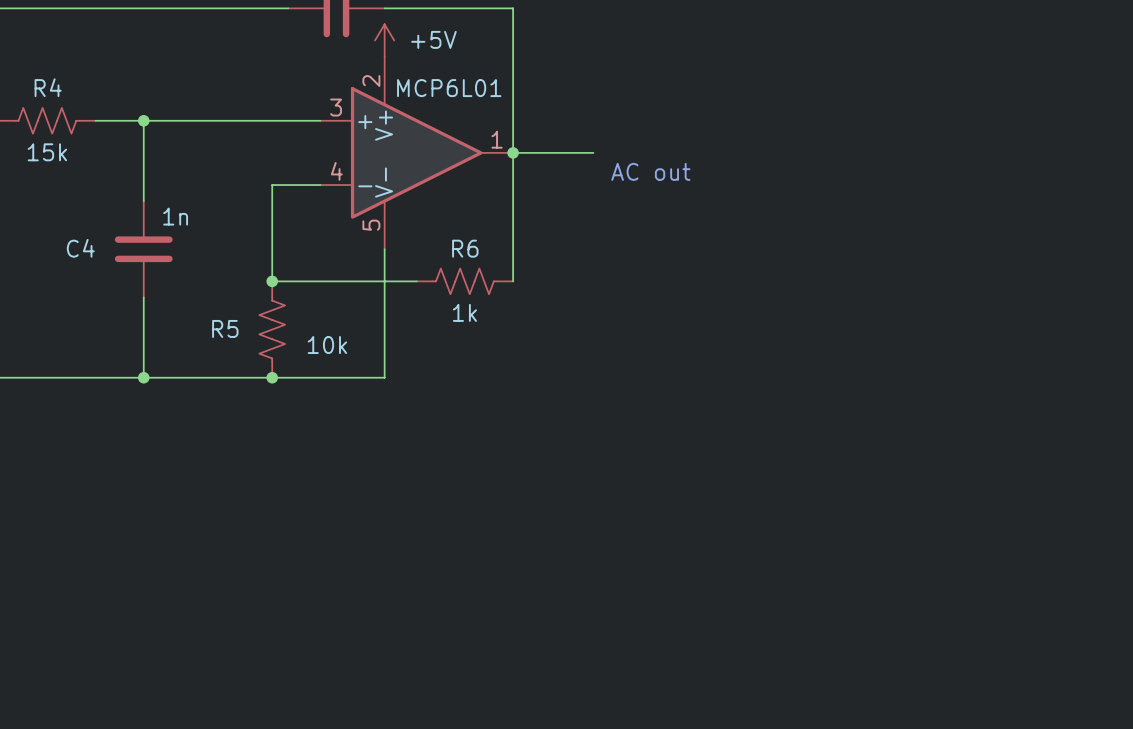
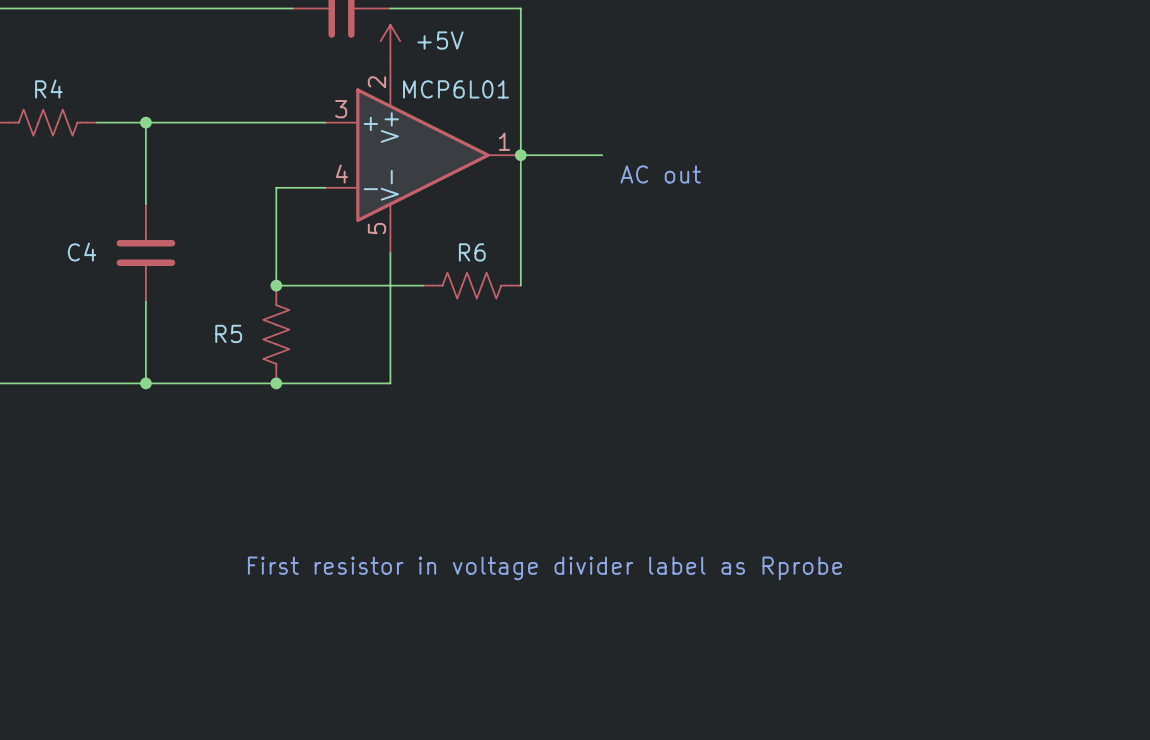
R4 value: 15k (47, 152) -> none
C4 value: 1n (175, 216) -> none
R6 value: 1k (464, 312) -> none
R5 value: 10k (327, 345) -> none
text: none -> First resistor in voltage divider label as Rprobe (545, 568)

